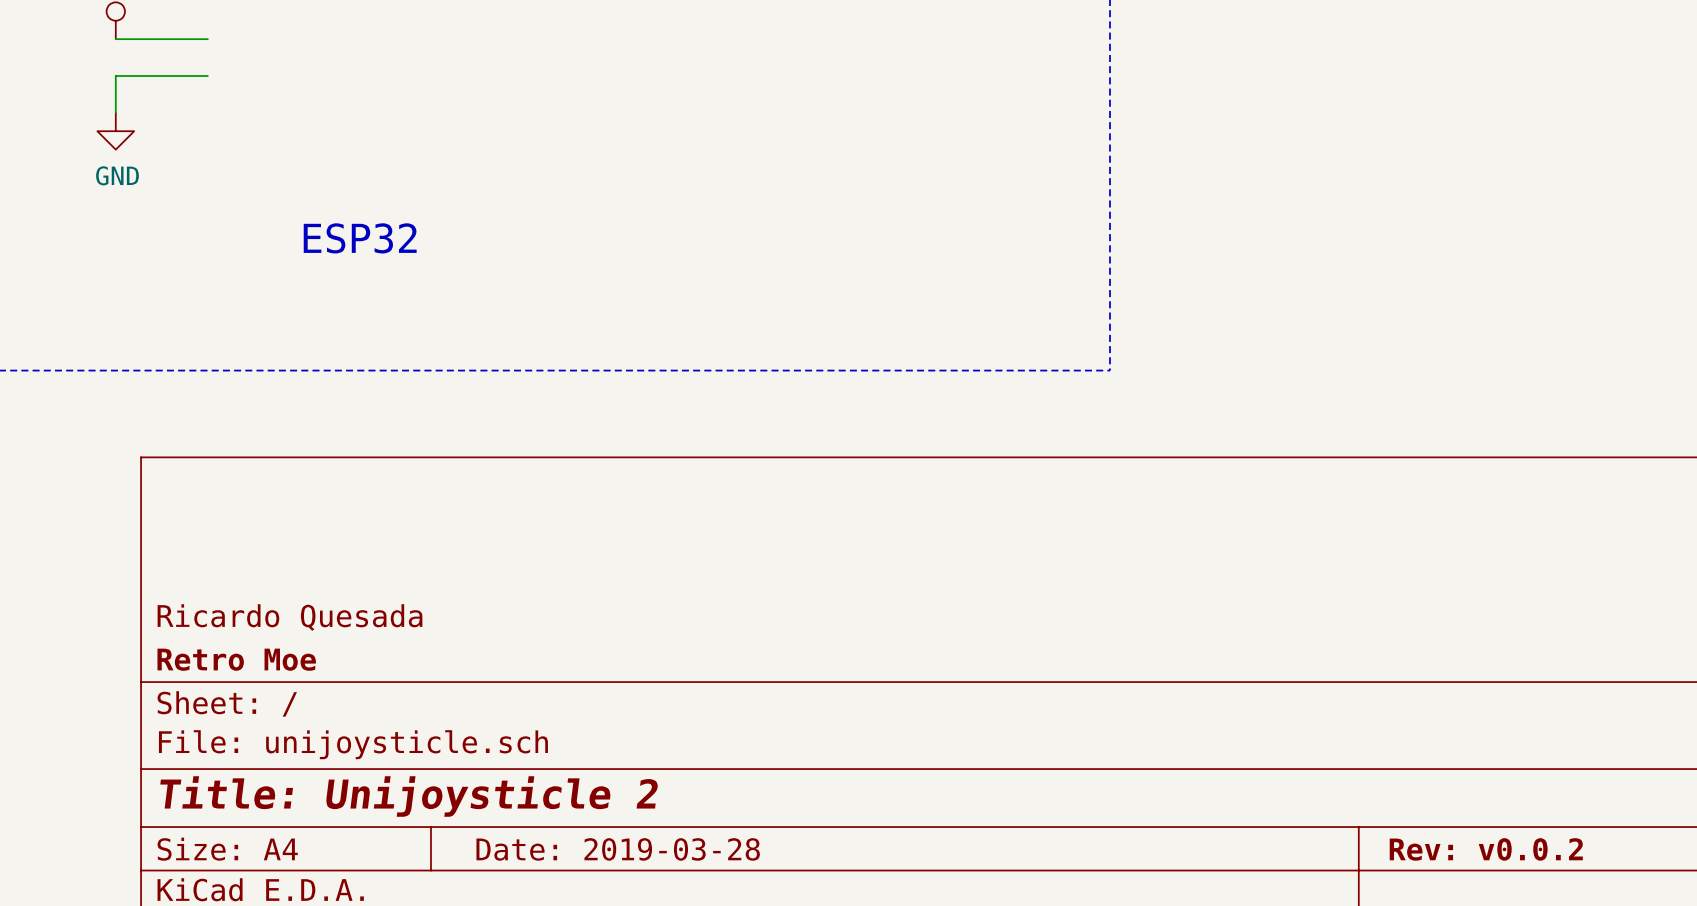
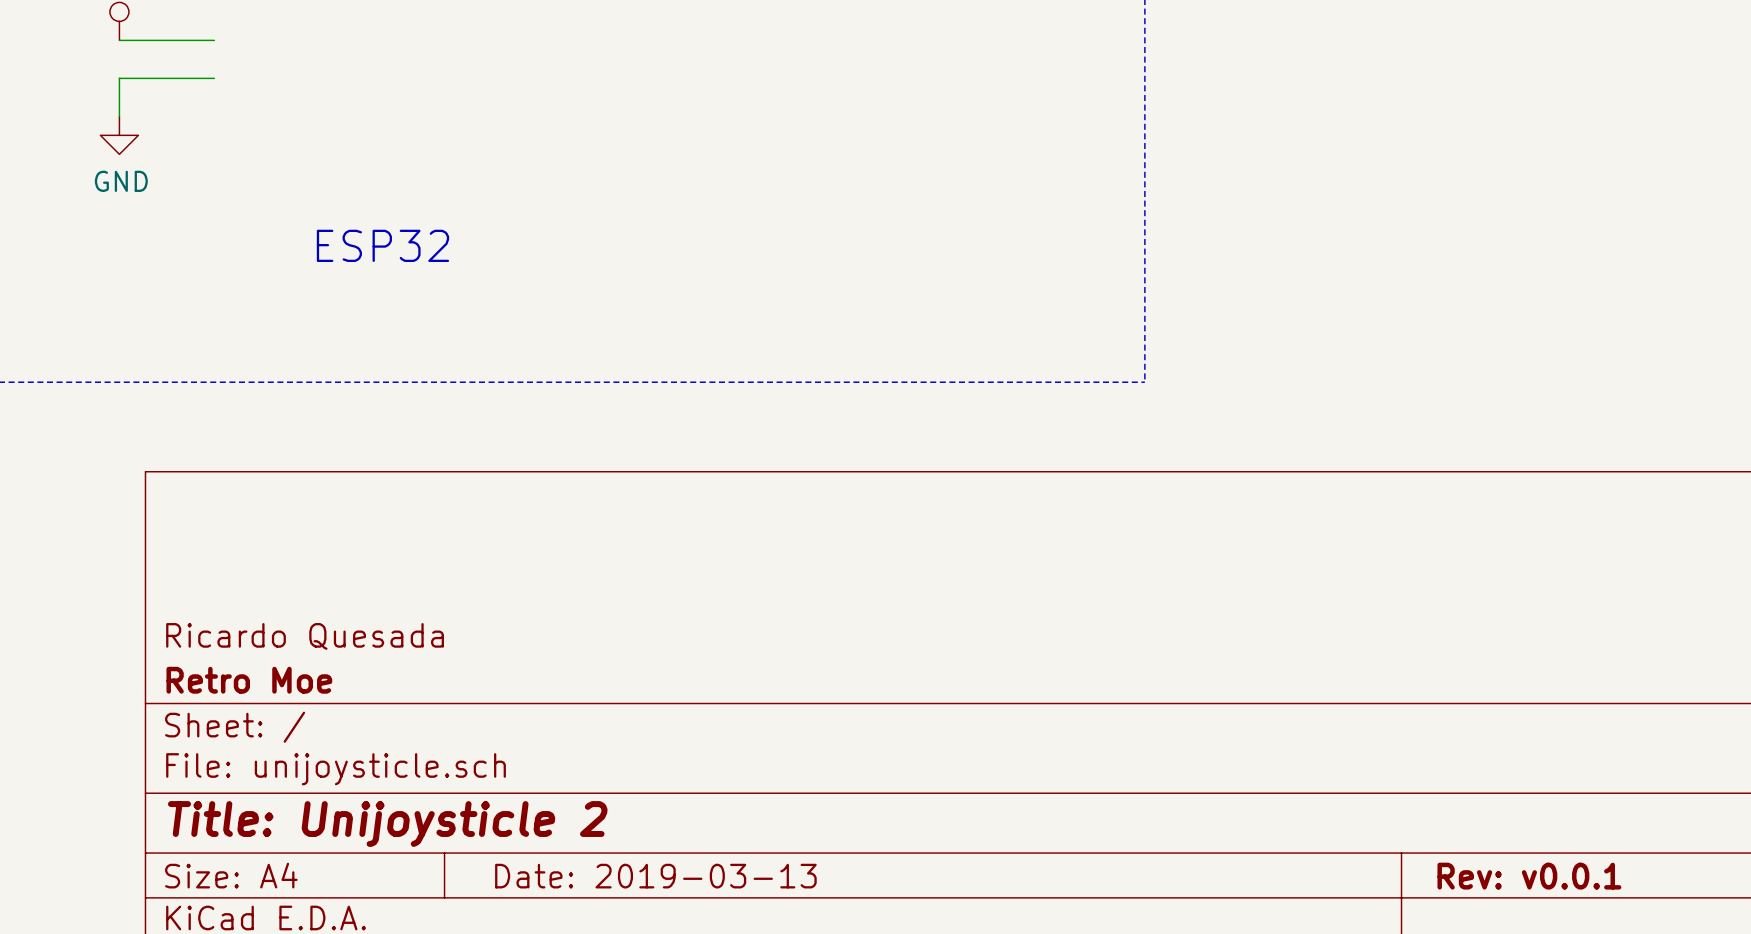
title block: Date: 2019-03-28 (618, 849) -> Date: 2019-03-13 (655, 876)
title block: Rev: v0.0.2 (1486, 849) -> Rev: v0.0.1 (1529, 876)

